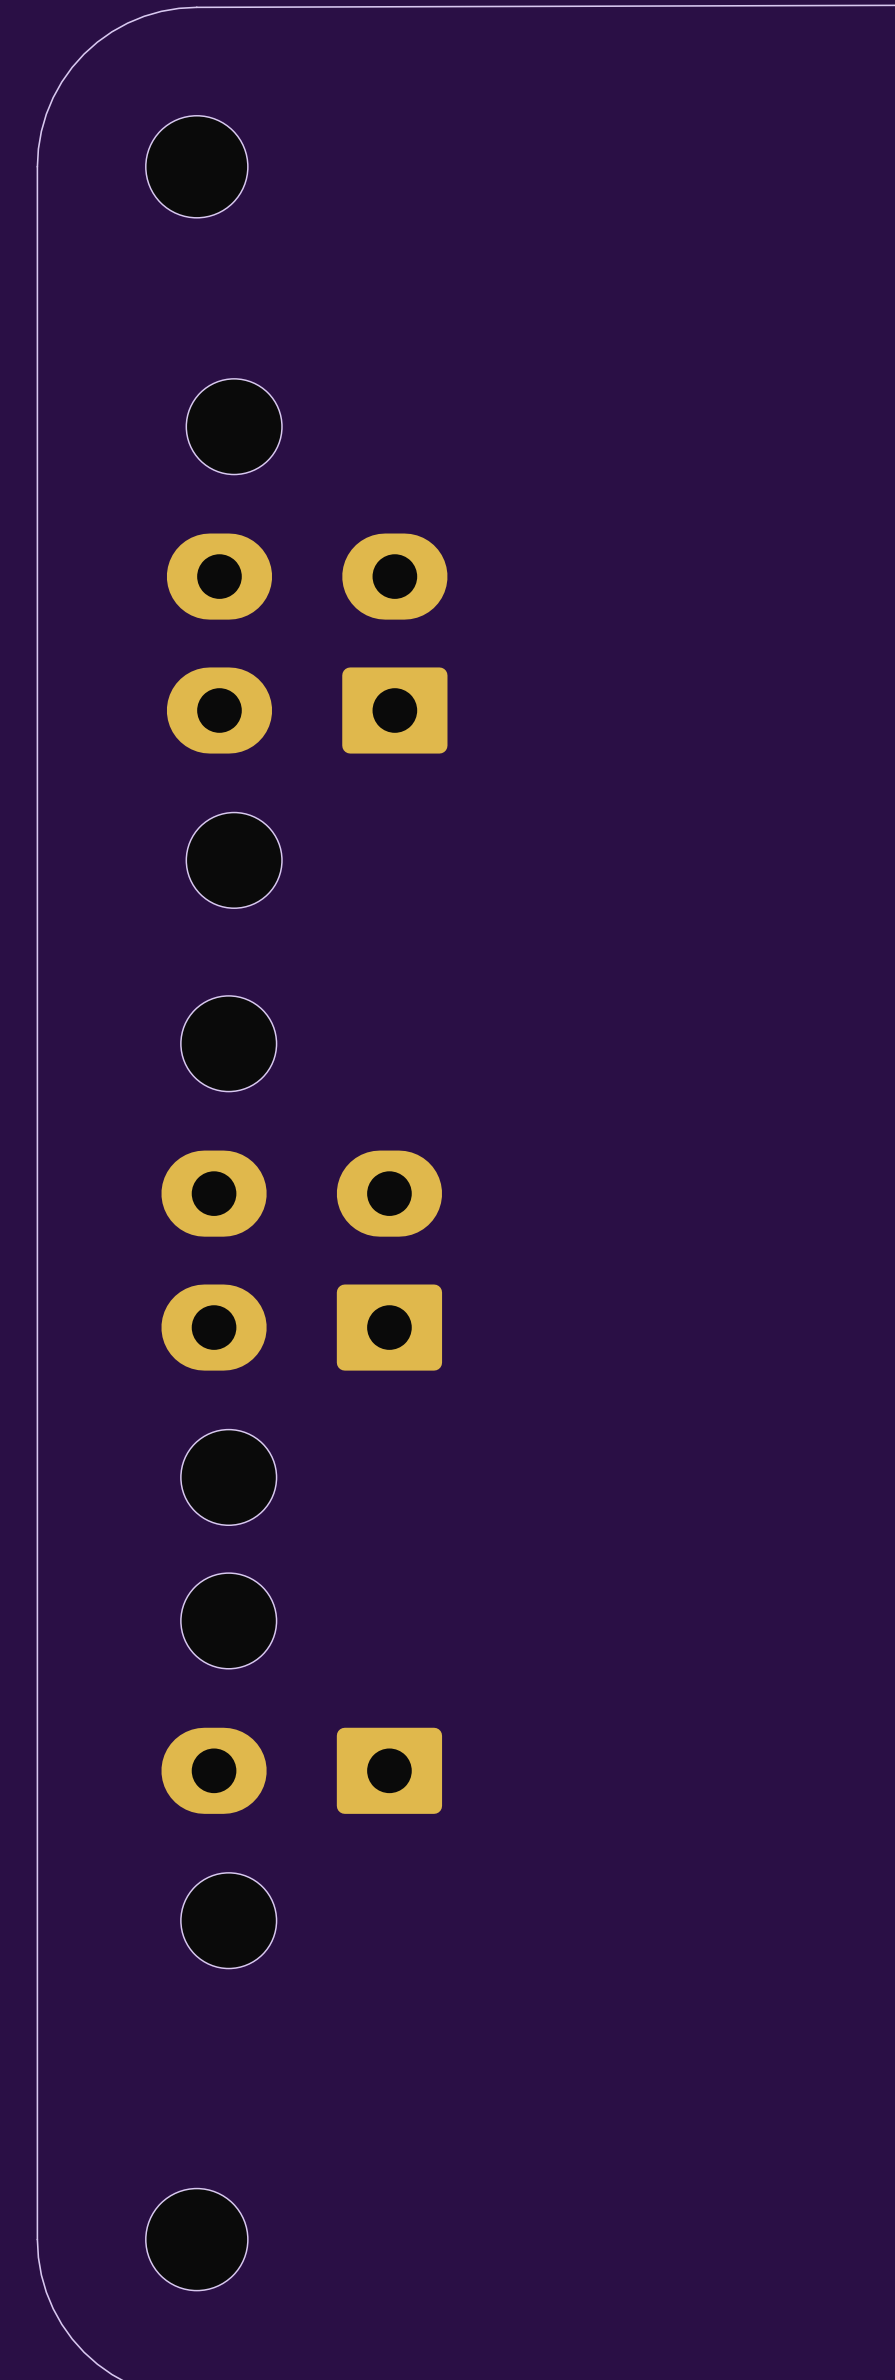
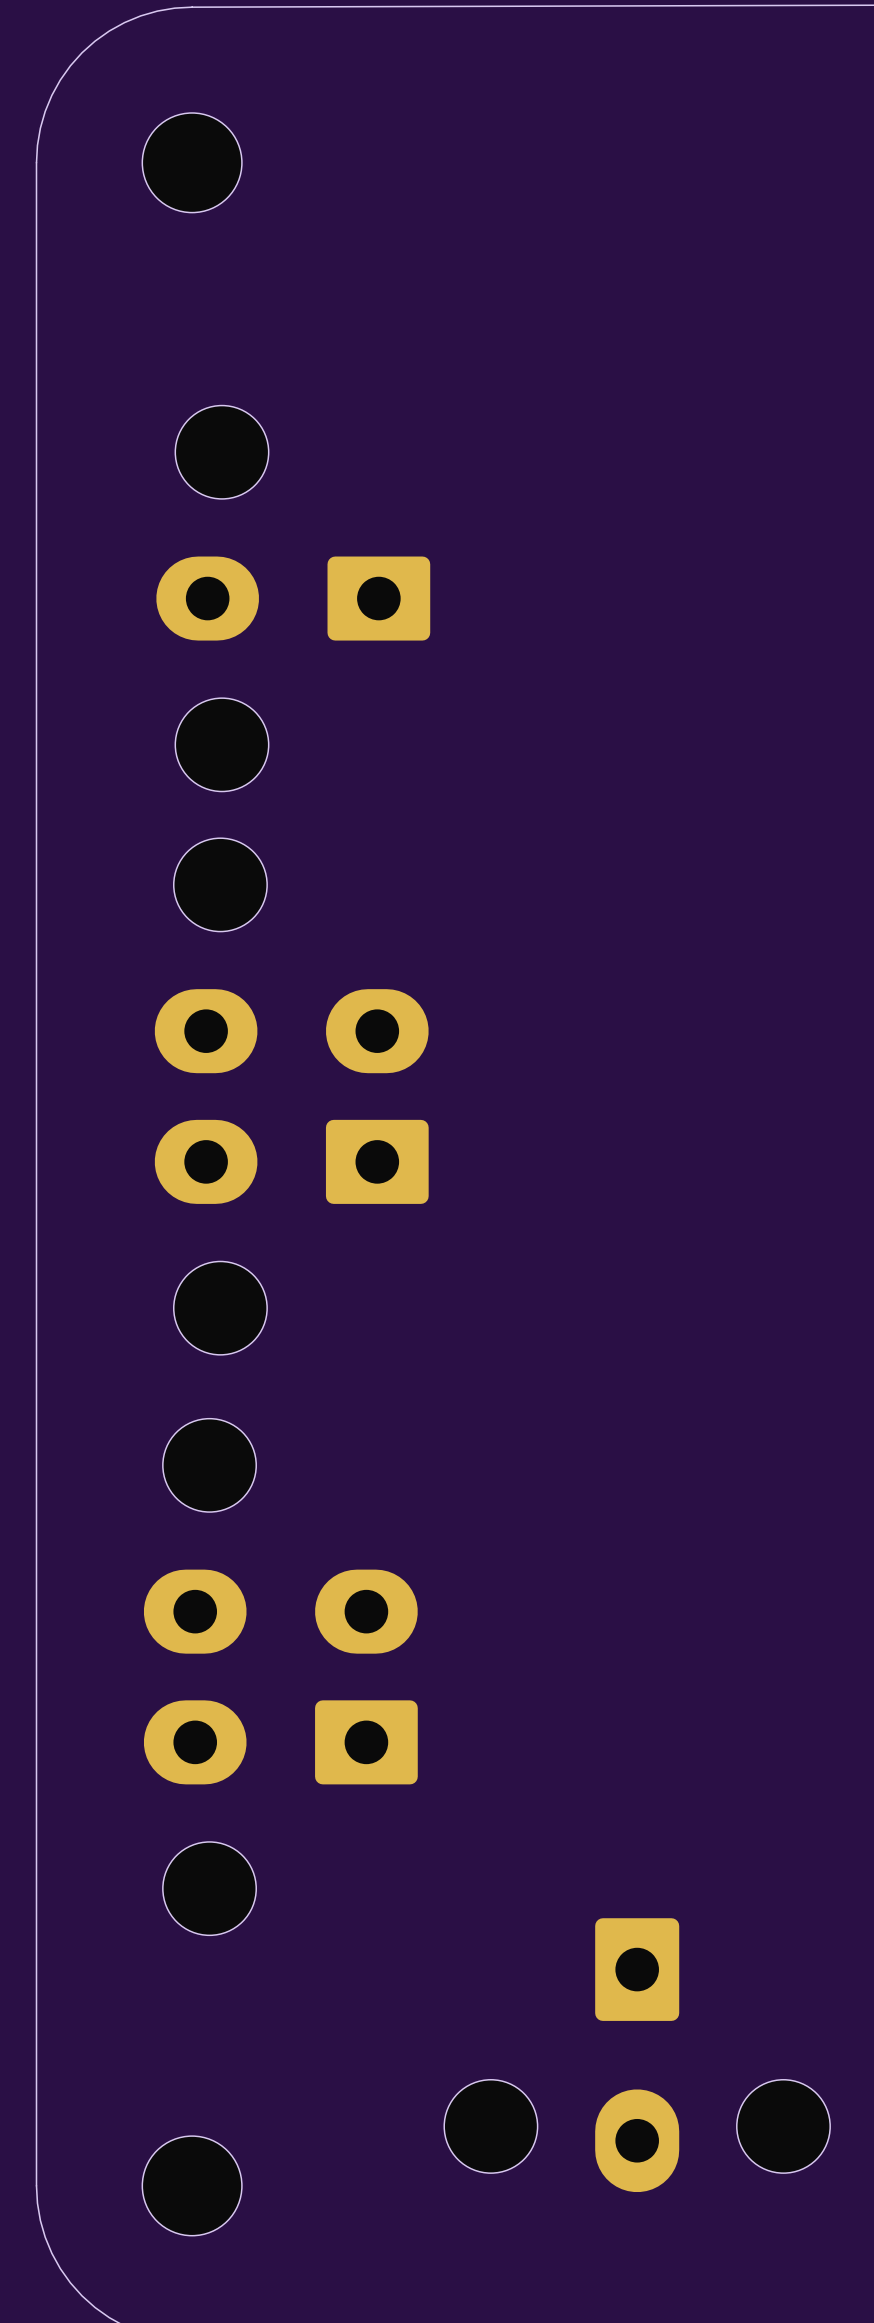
part footprint: [166, 378, 448, 909] -> [156, 405, 431, 792]
part position: (301, 1260) -> (291, 1096)
part: none -> (280, 1677)
part rotation: 0° (301, 1770) -> 90° counterclockwise (637, 2055)
part position: (301, 1770) -> (637, 2055)

